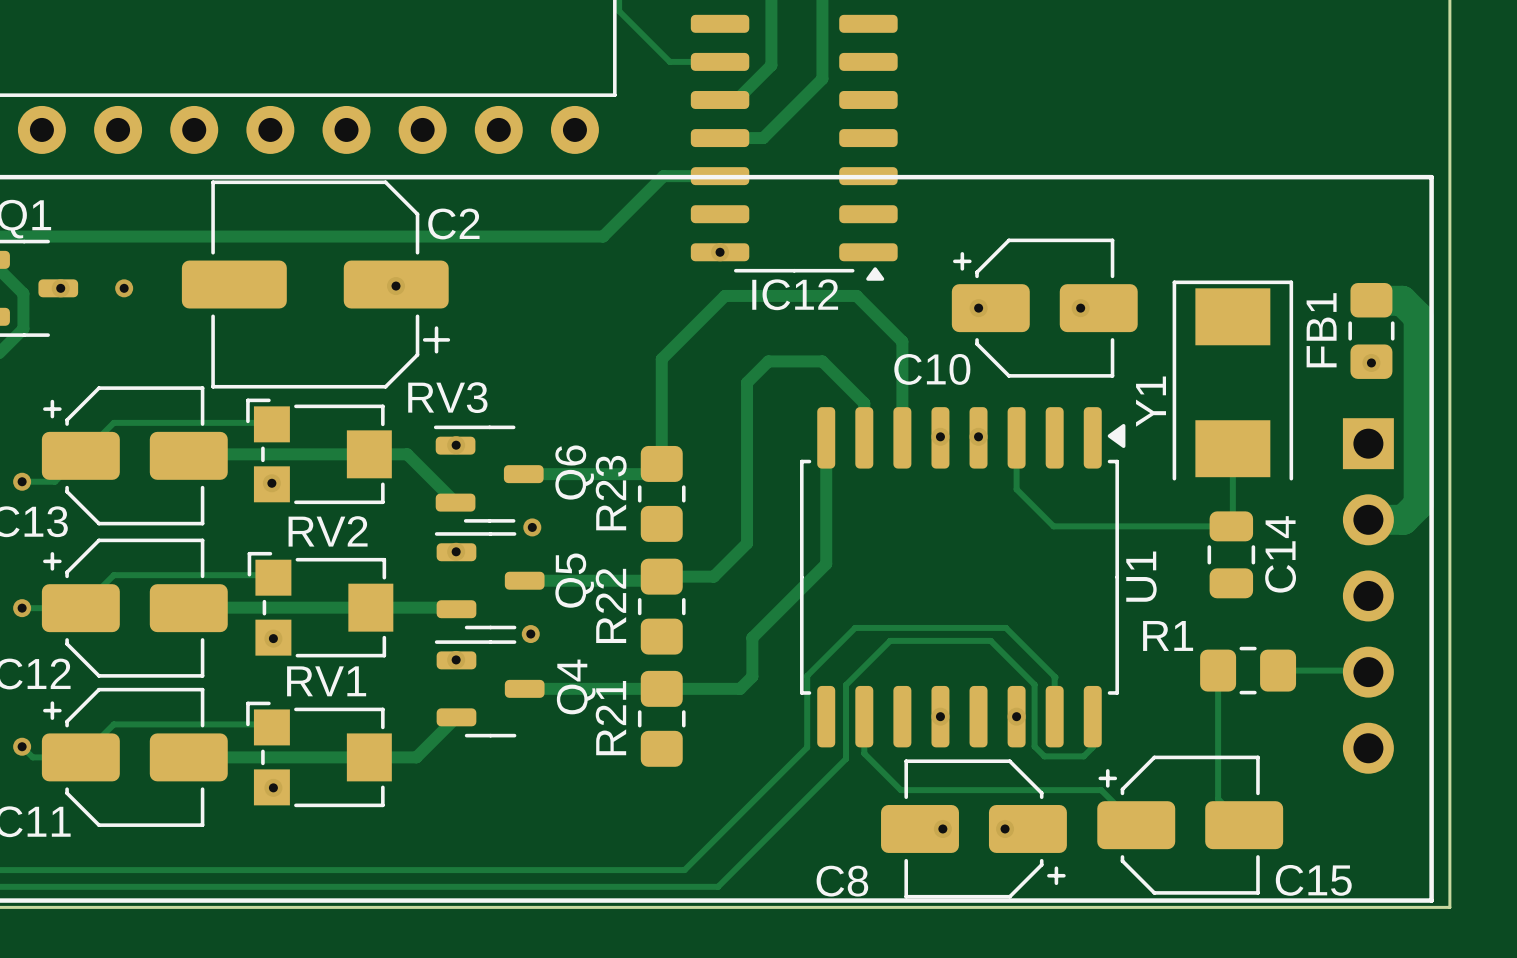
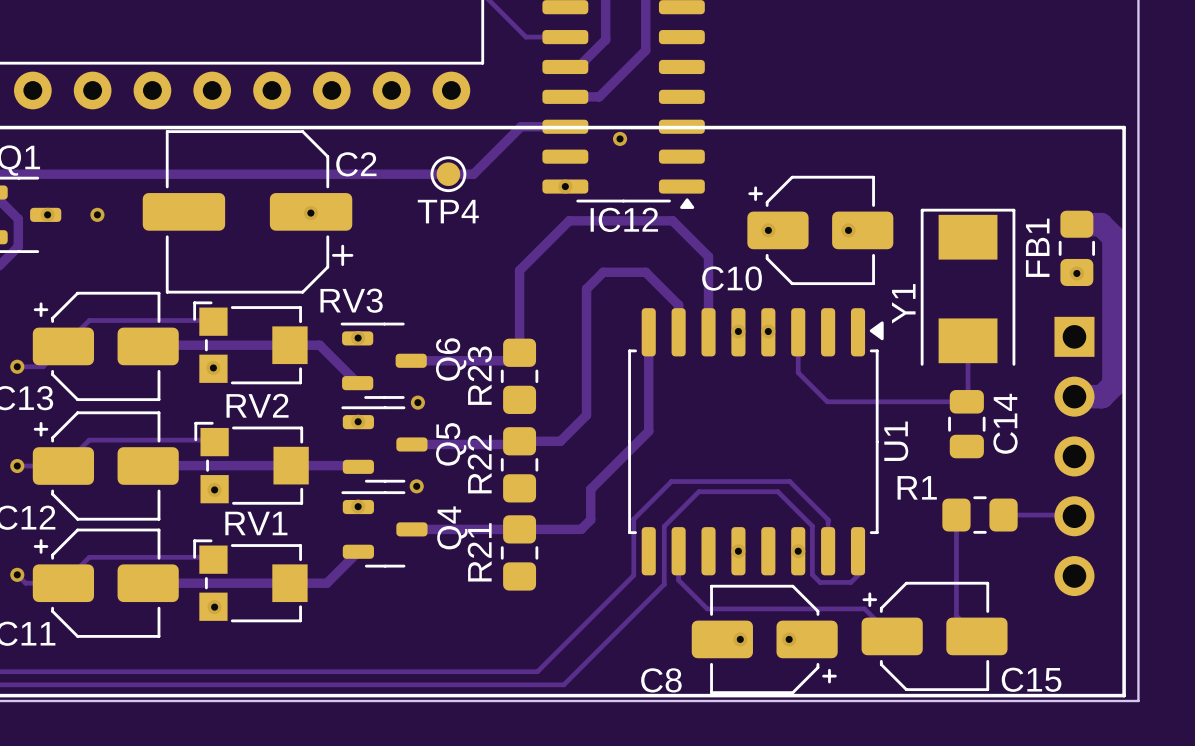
via: none -> (620, 138)
TP4: none -> (448, 174)

